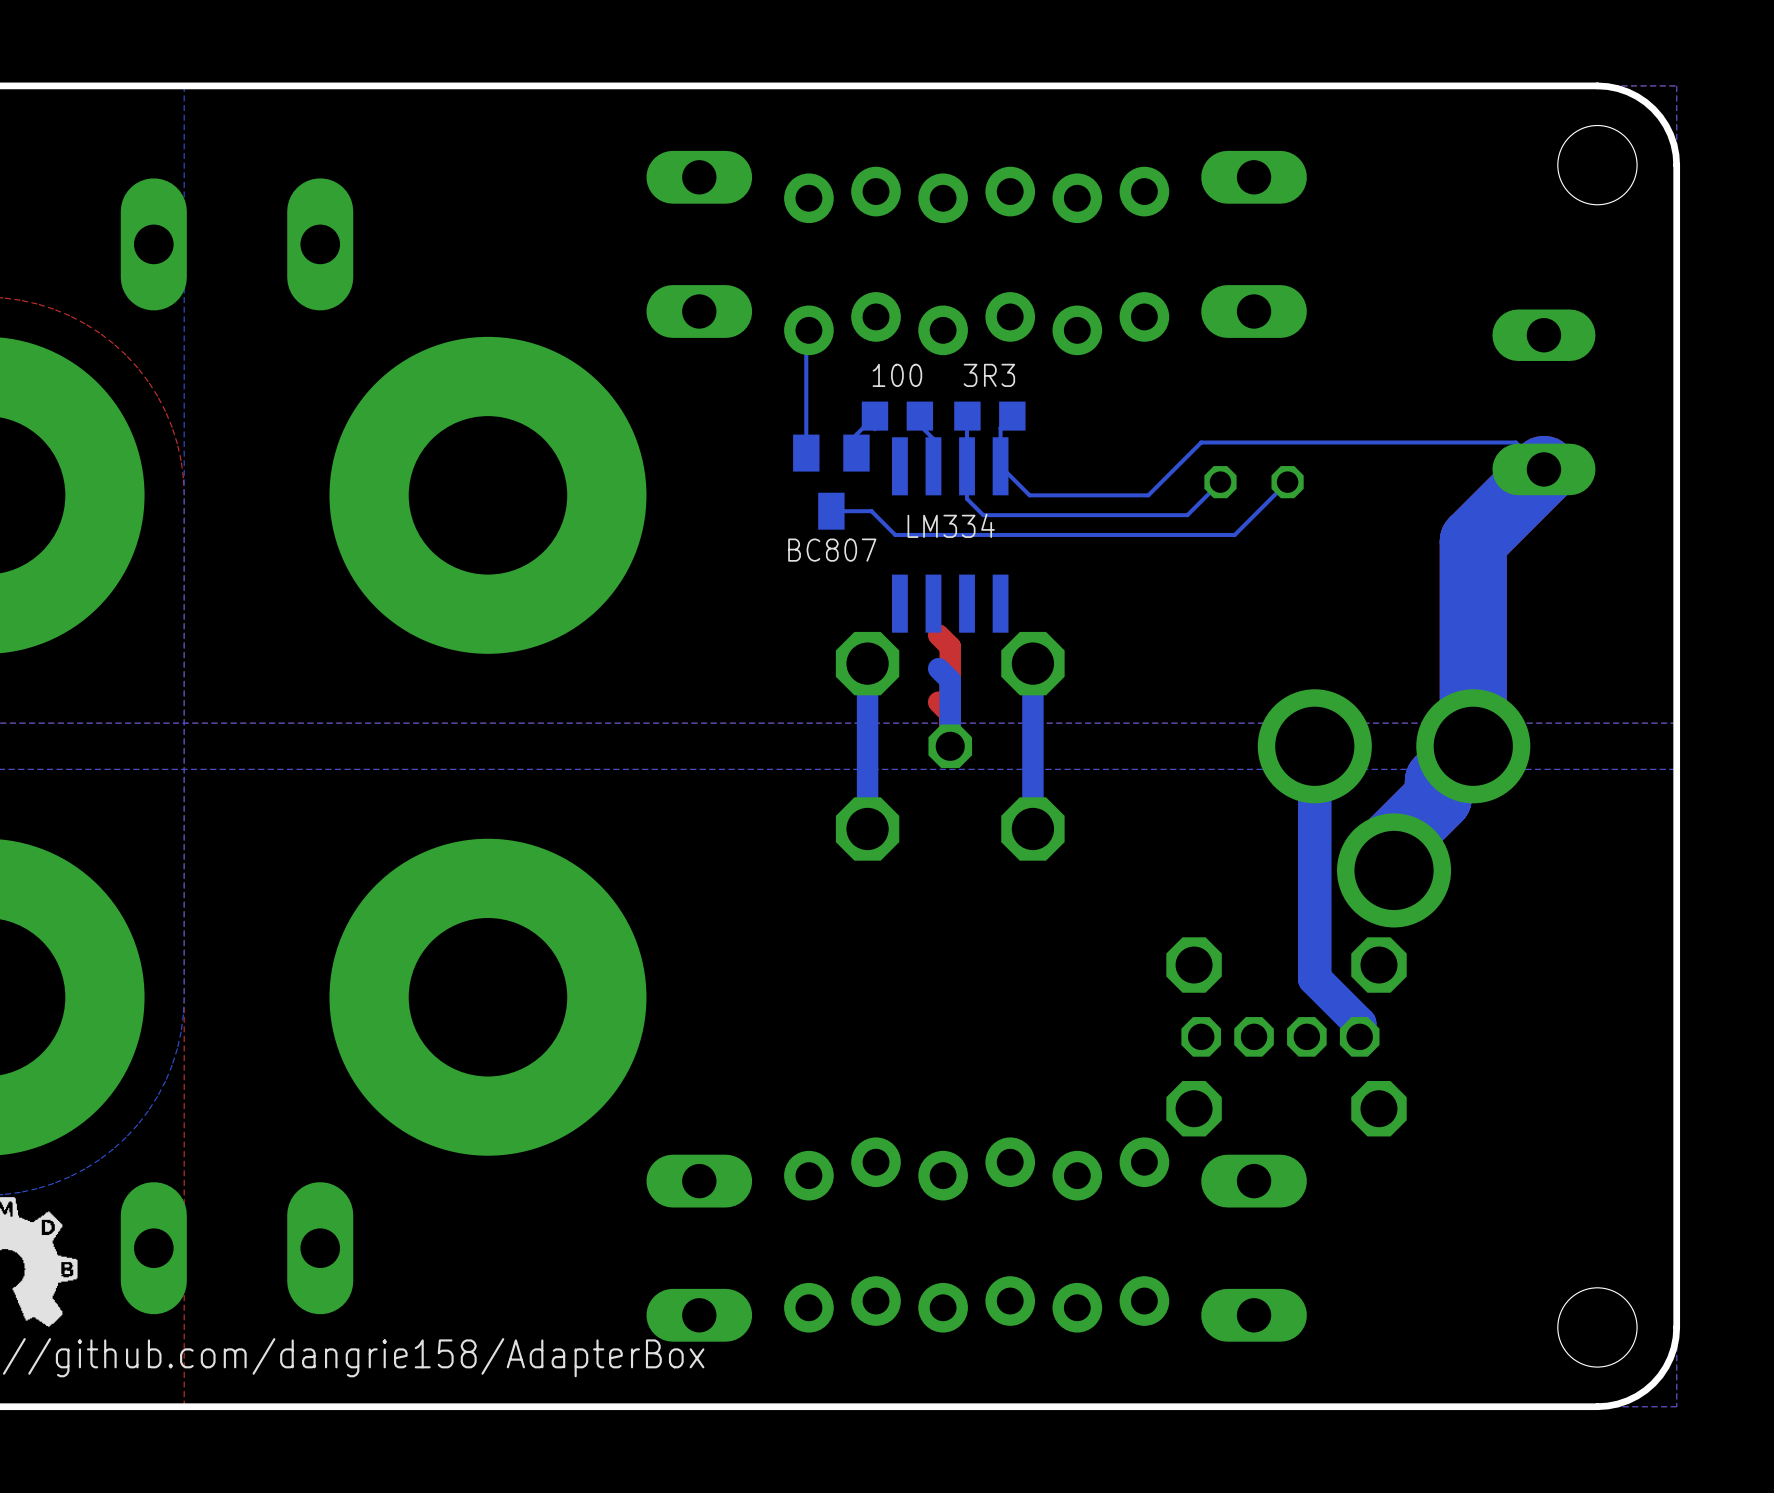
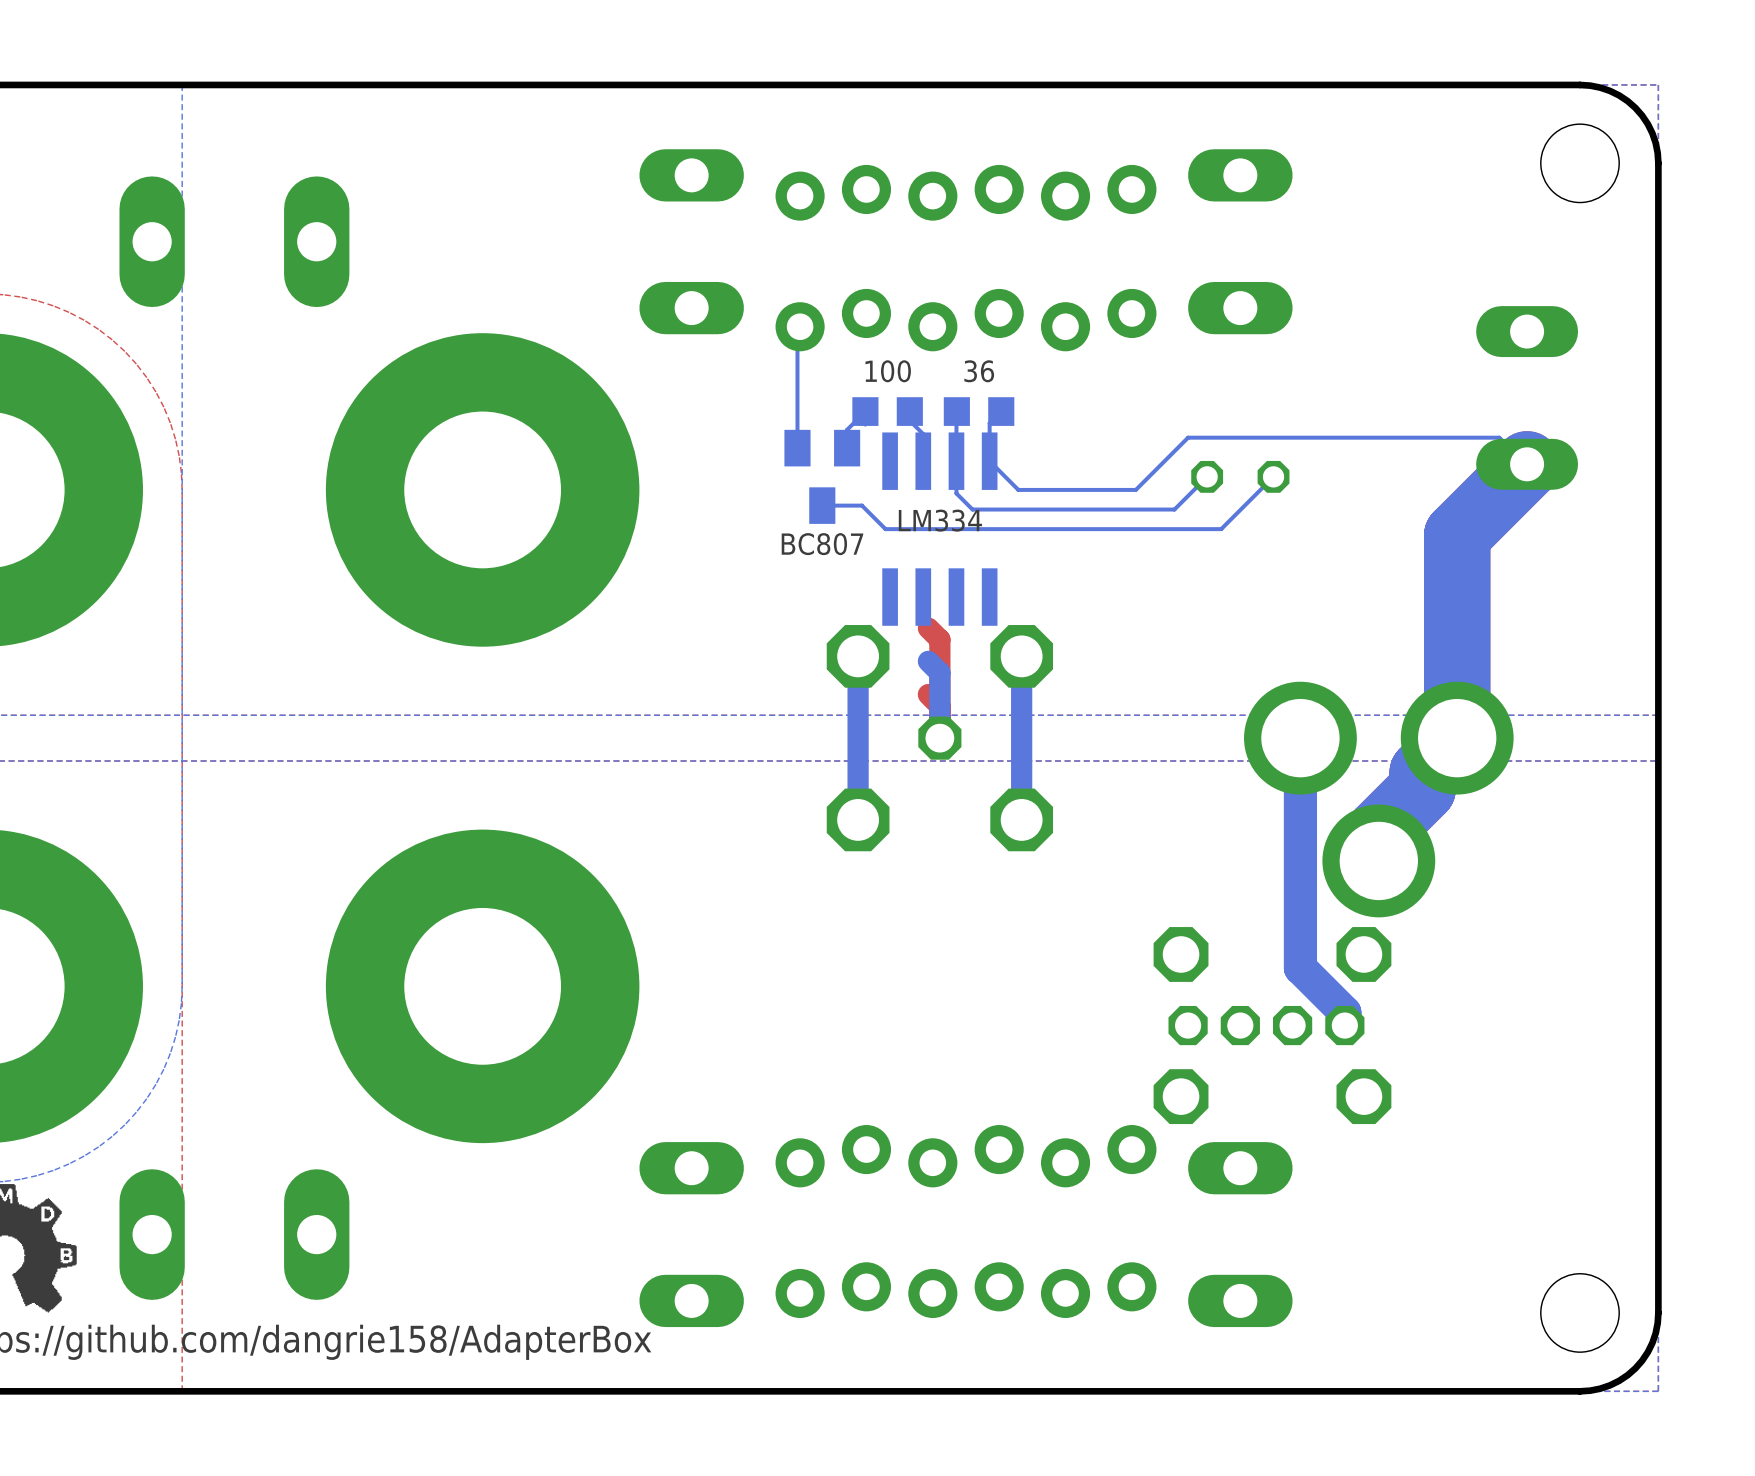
part value: 3R3 (989, 375) -> 36 (979, 371)

